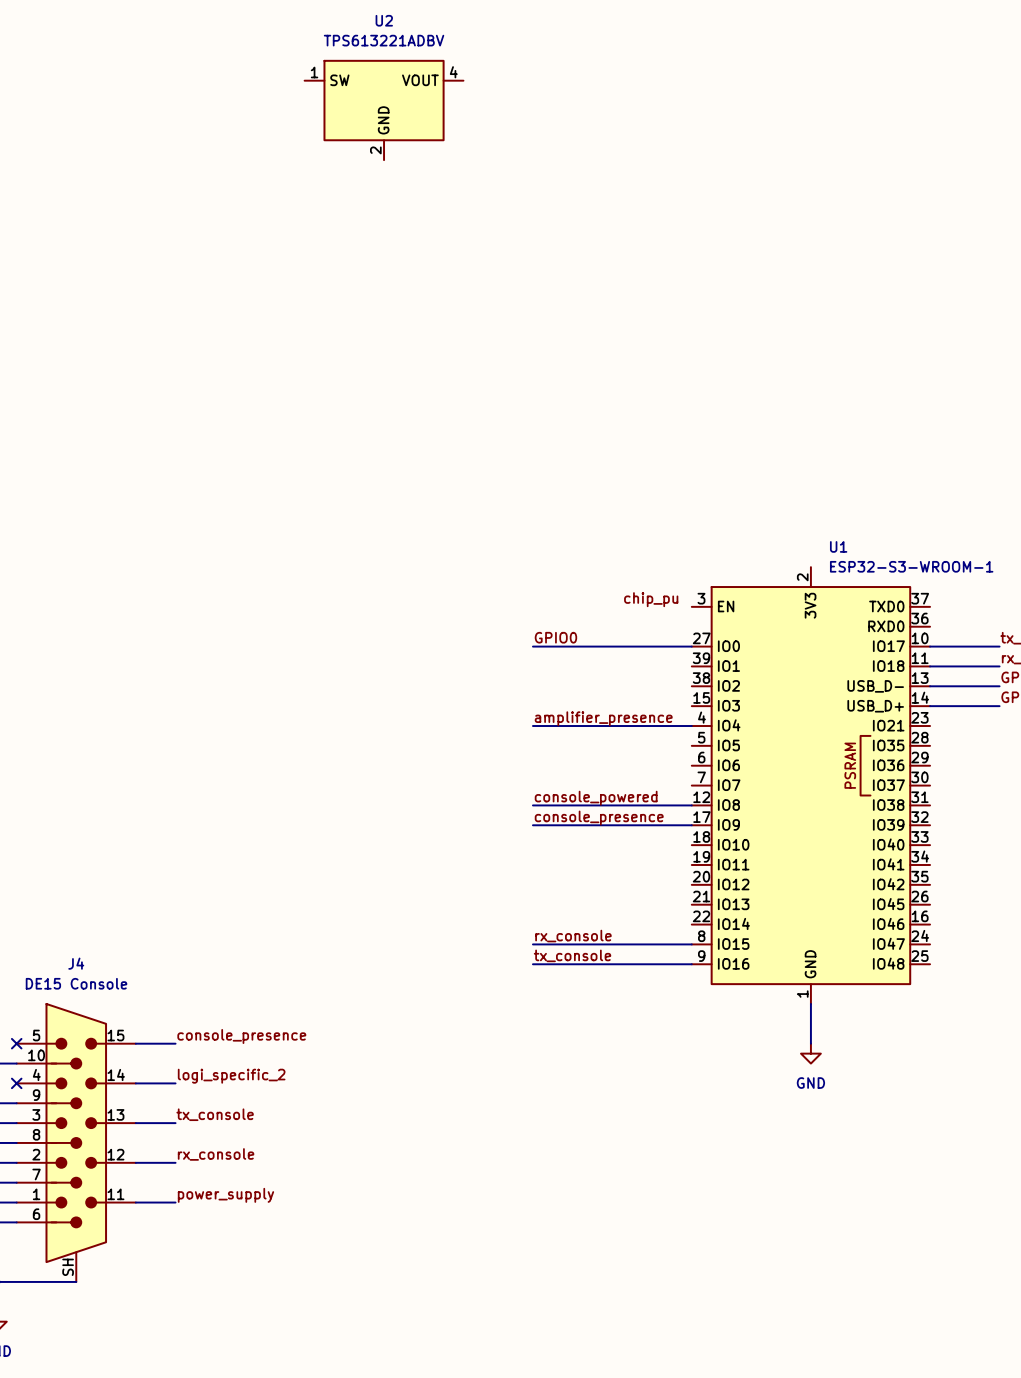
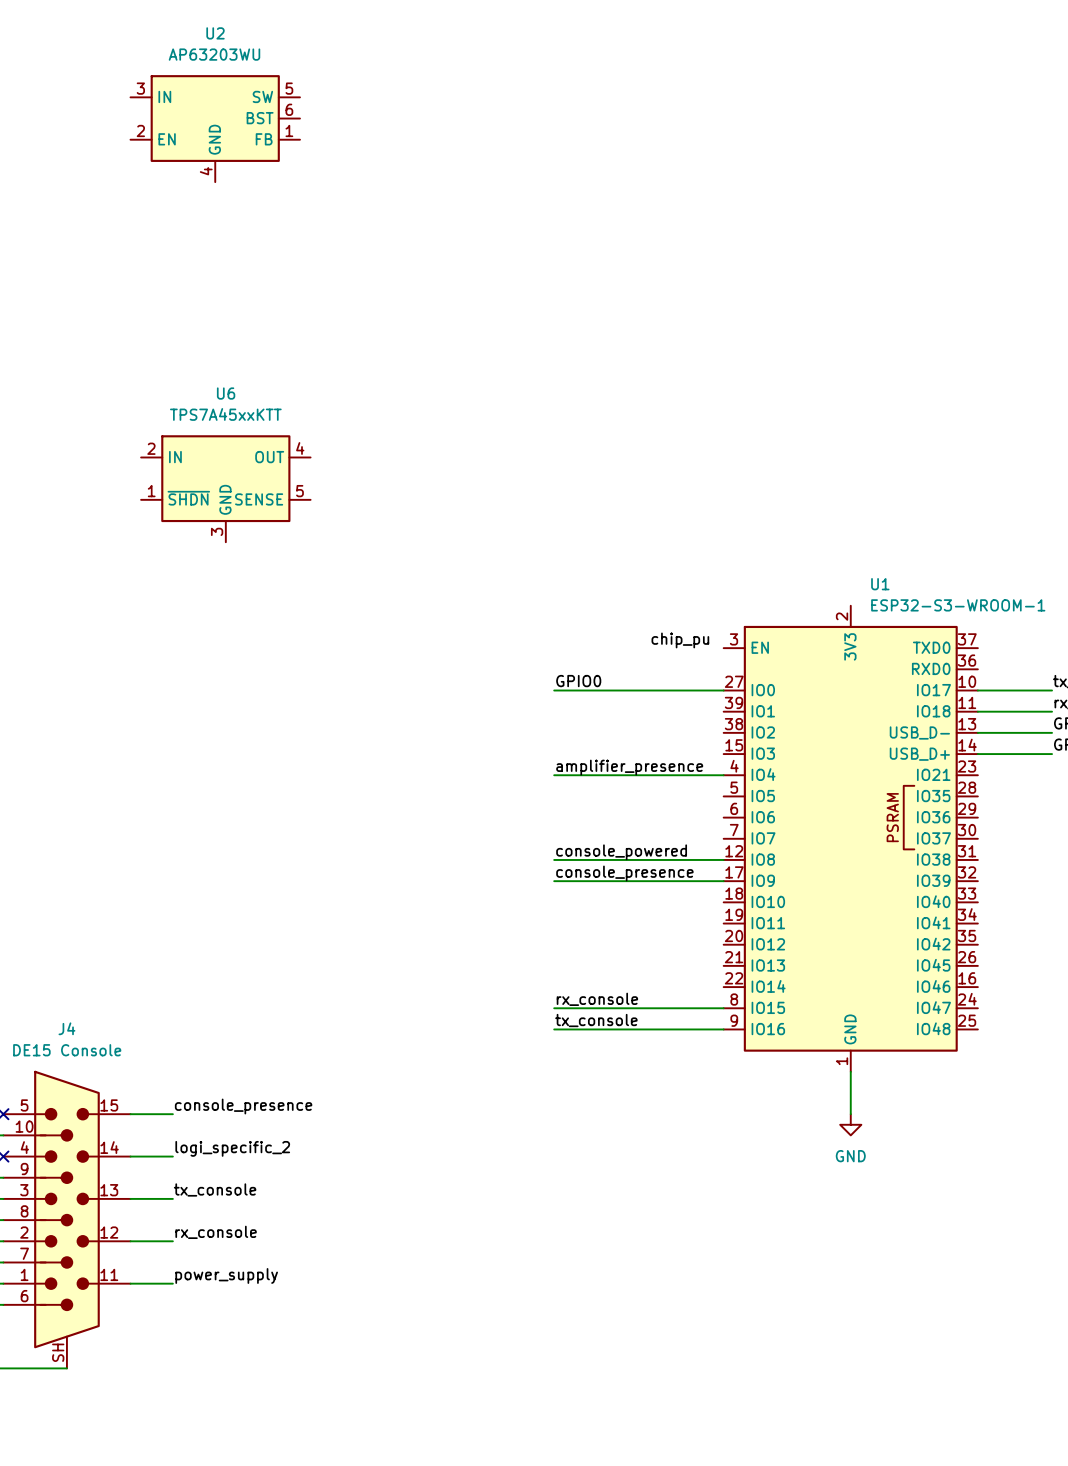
U2 value: TPS613221ADBV (384, 40) -> AP63203WU (214, 54)
U2 symbol: [304, 59, 464, 161] -> [130, 75, 300, 183]
U6: none -> TPS7A45xxKTT (225, 488)

